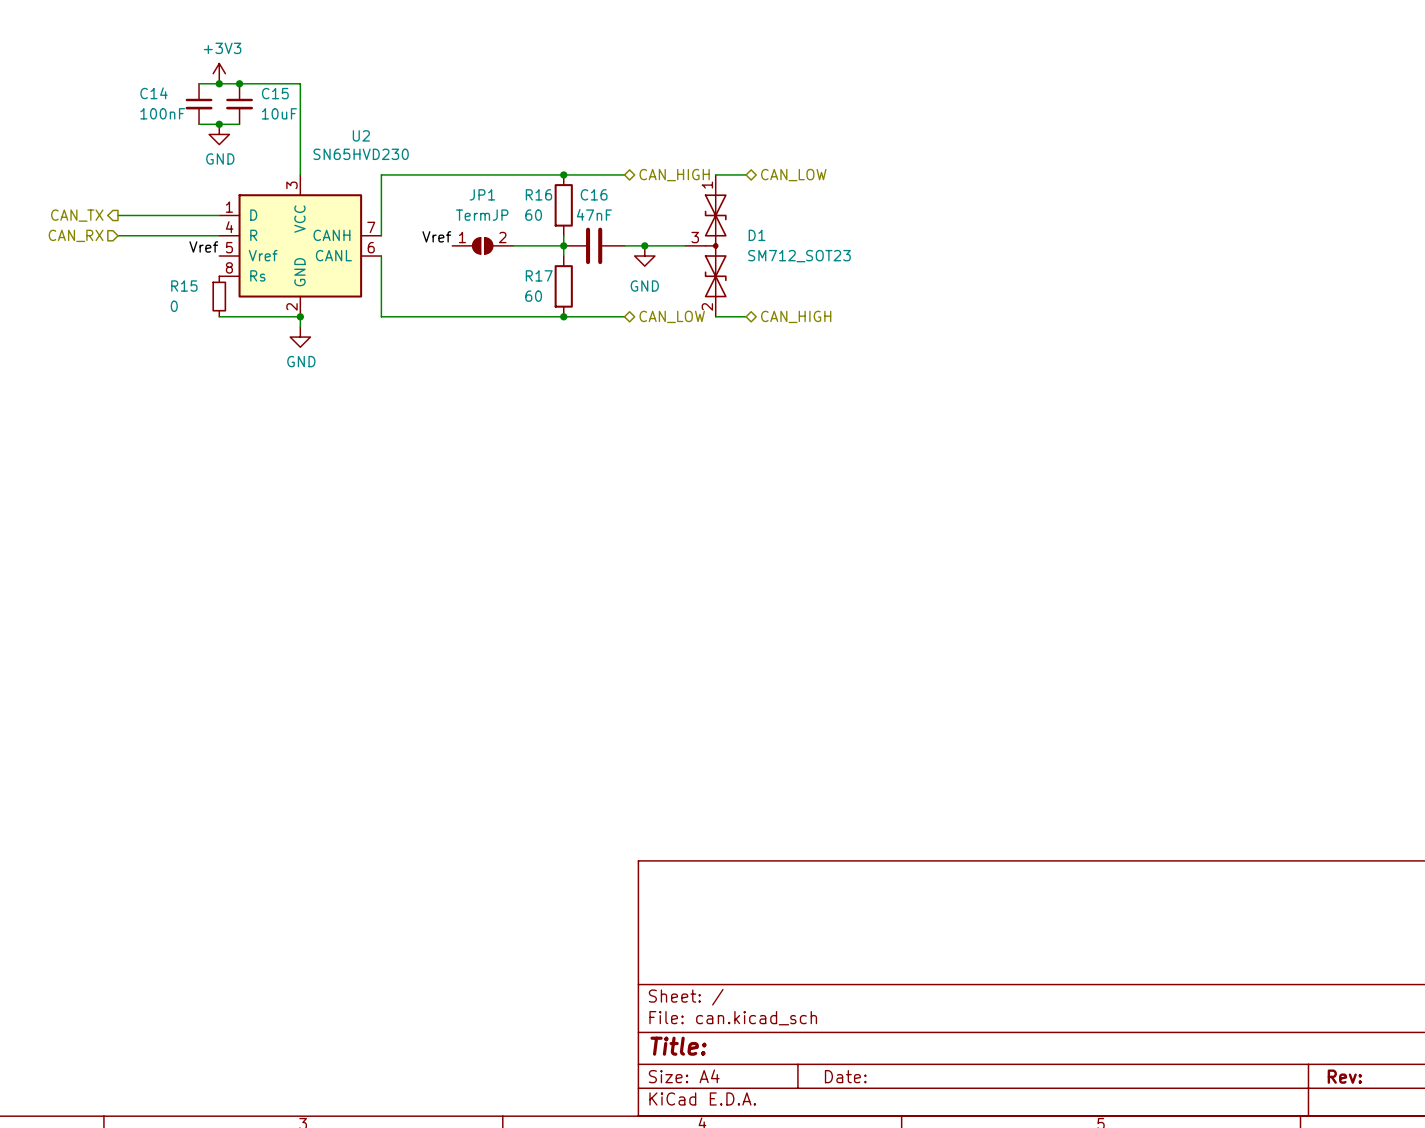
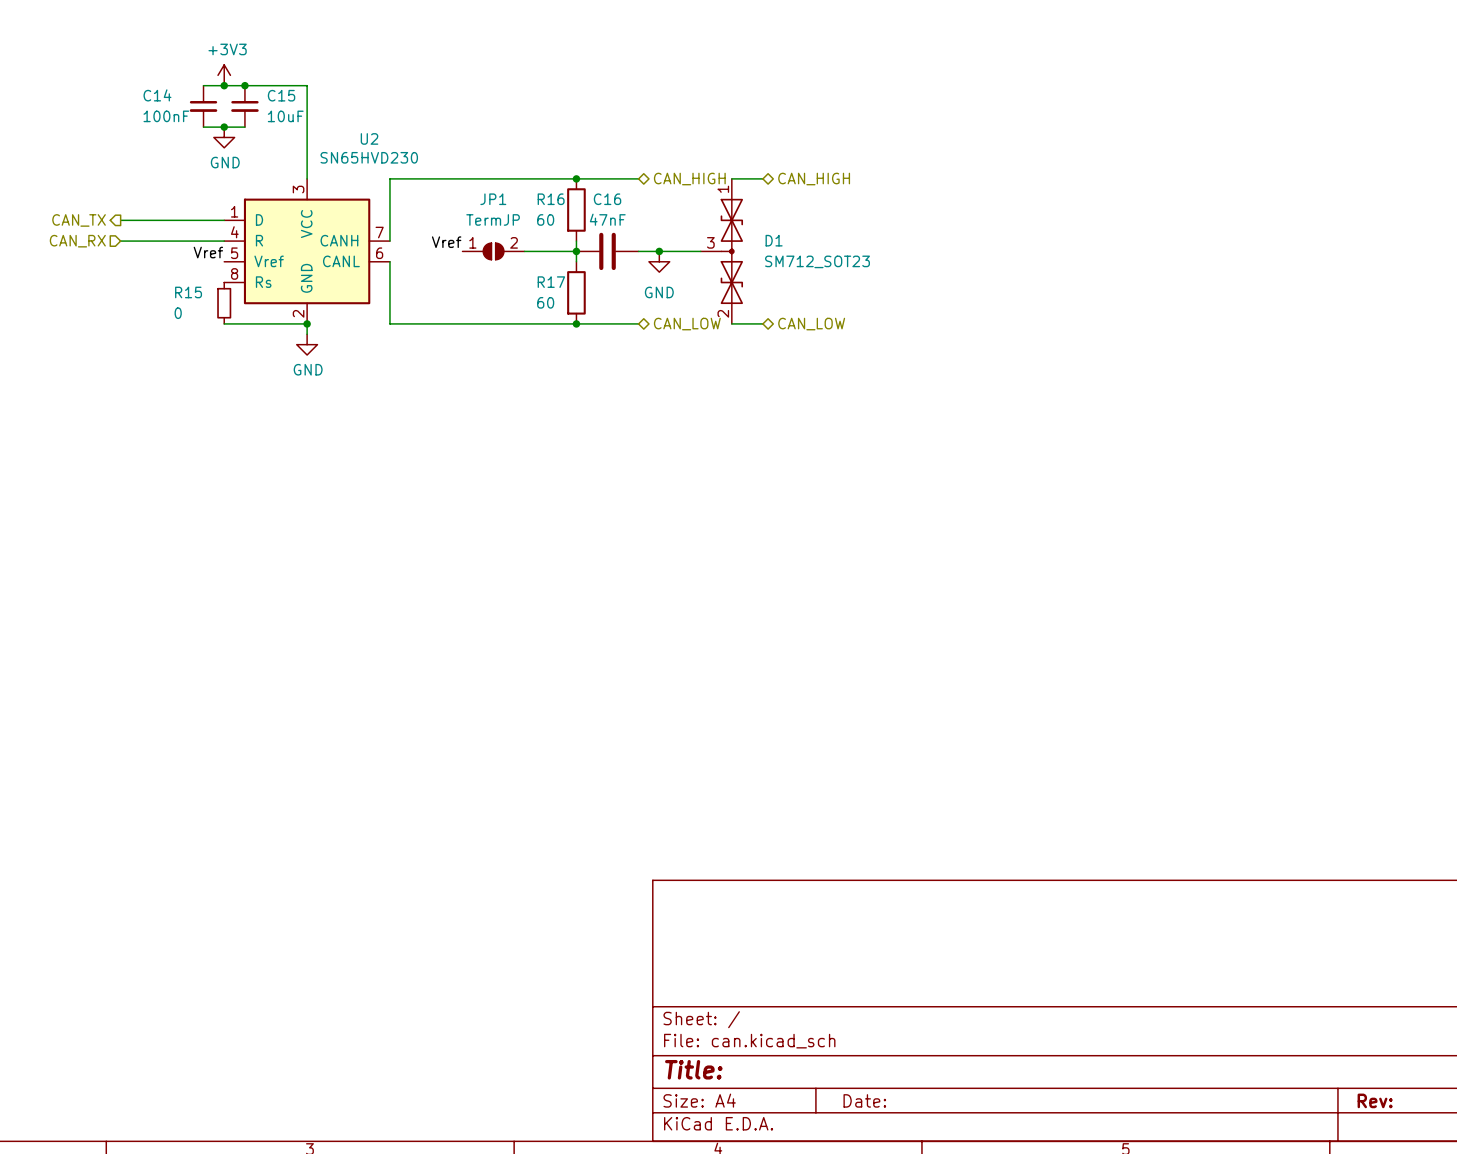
hierarchical label: CAN_LOW (793, 175) -> CAN_HIGH (814, 179)
hierarchical label: CAN_HIGH (796, 316) -> CAN_LOW (811, 324)

